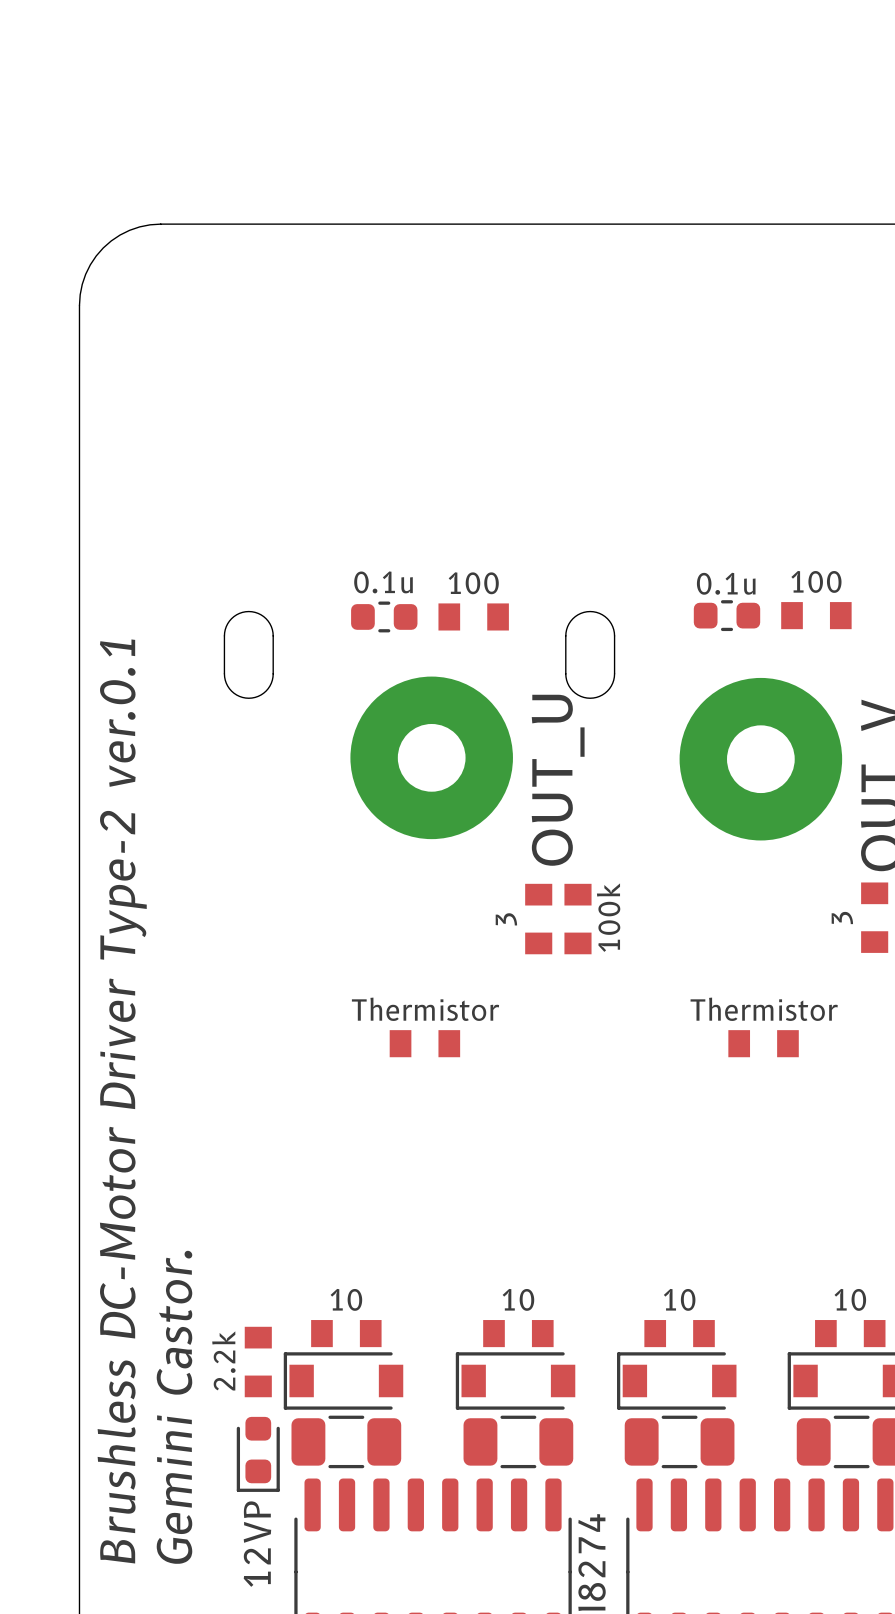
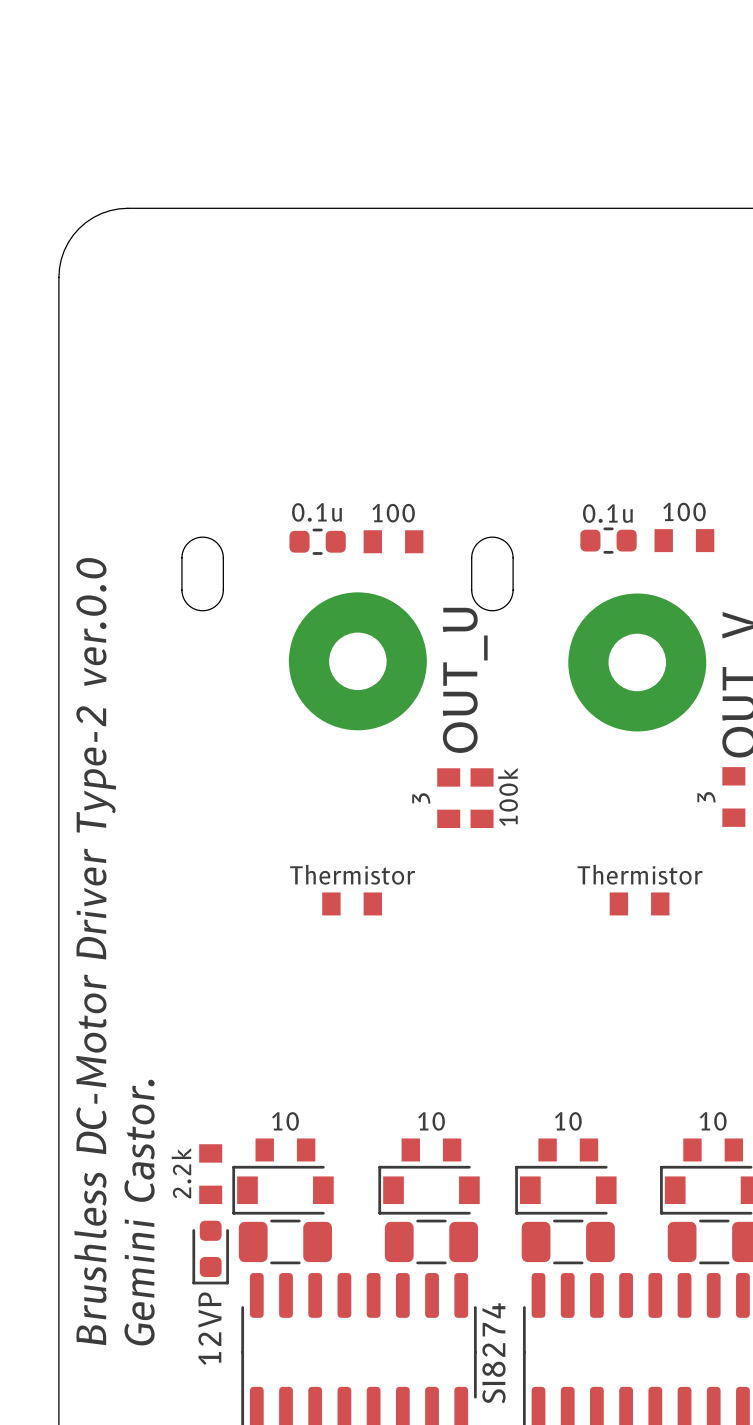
text: Brushless DC-Motor Driver Type-2 ver.0.1 (122, 1101) -> Brushless DC-Motor Driver Type-2 ver.0.0 (95, 951)

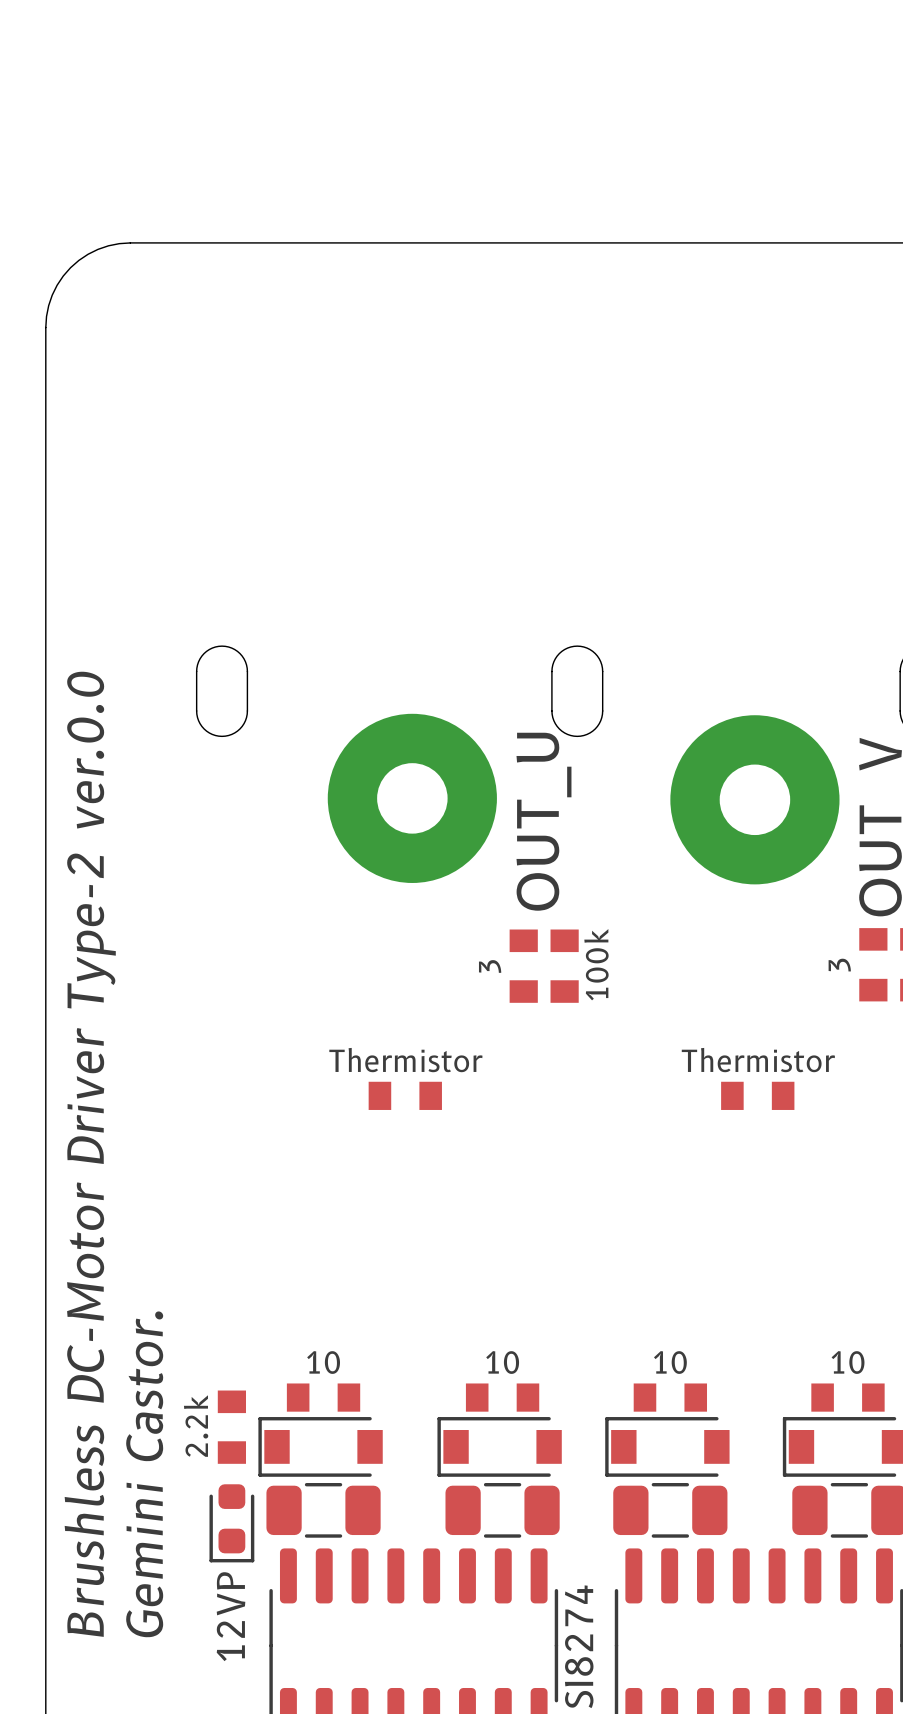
part: 0.1u (608, 540) -> none
part: 100 (684, 540) -> none
part: 0.1u (317, 541) -> none
part: 100 (393, 541) -> none

